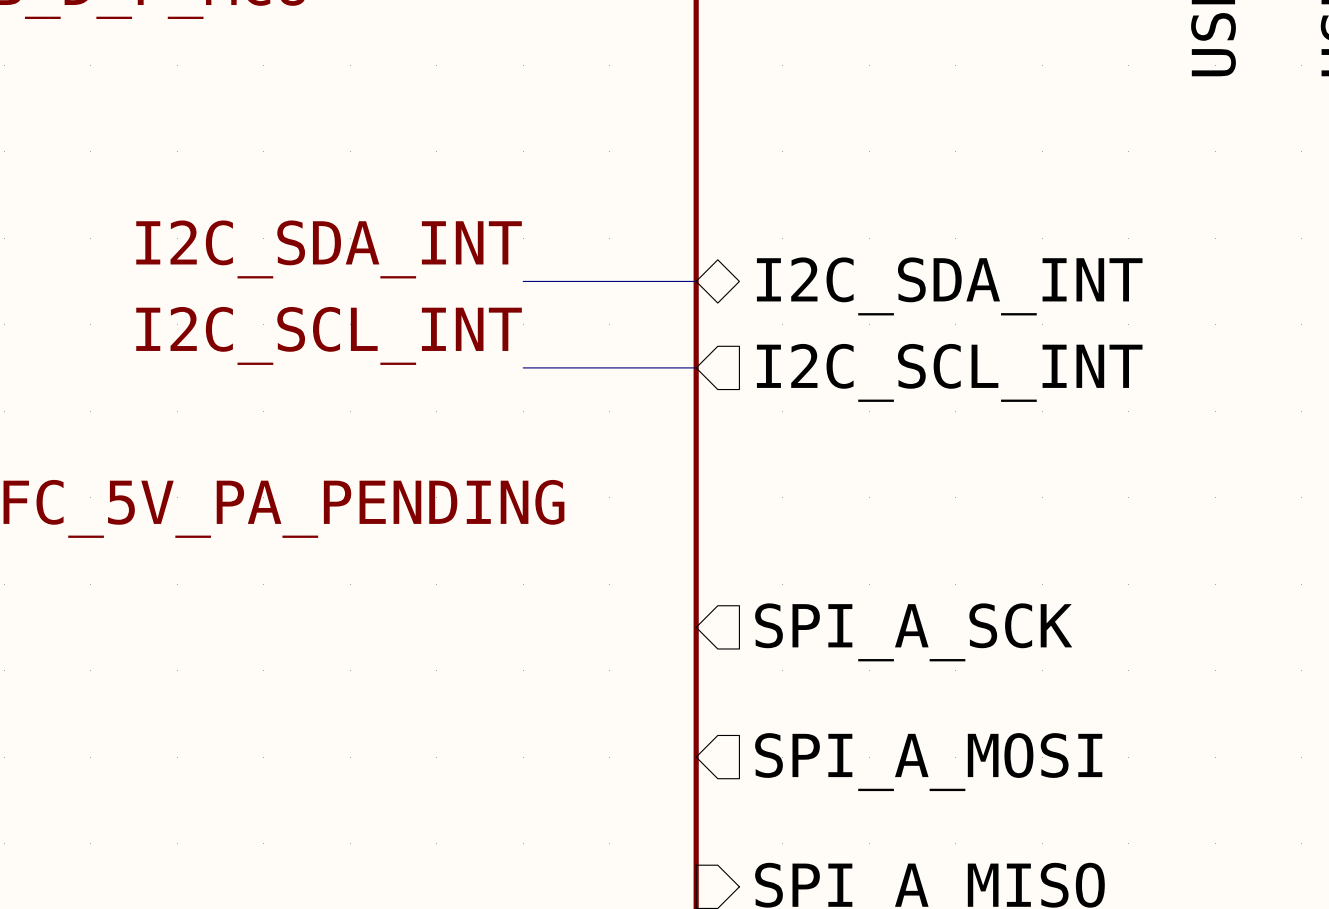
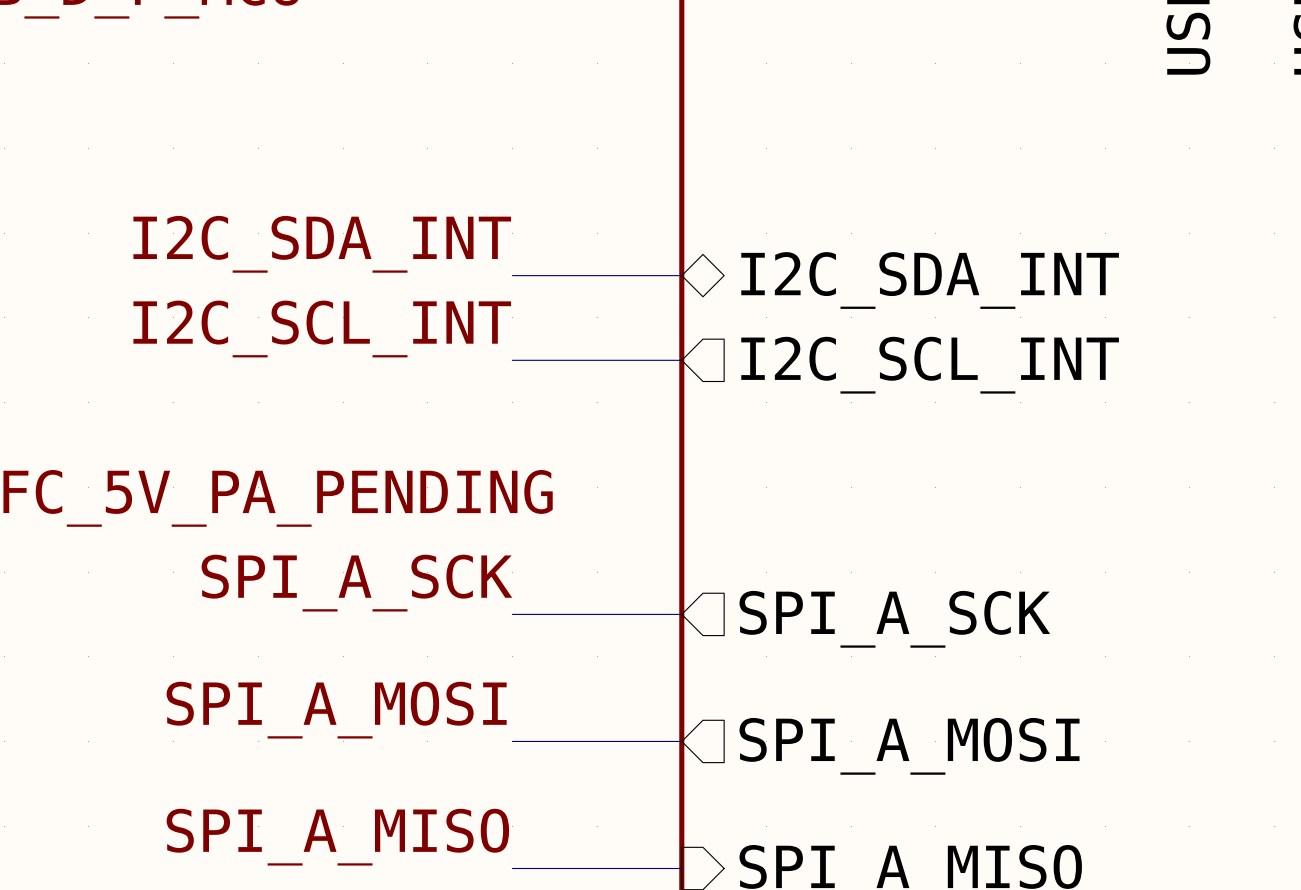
label: none -> SPI_A_SCK (356, 583)
wire: none -> (512, 614) (681, 614)
label: none -> SPI_A_MOSI (336, 710)
wire: none -> (512, 741) (681, 741)
label: none -> SPI_A_MISO (337, 837)
wire: none -> (512, 868) (681, 868)

